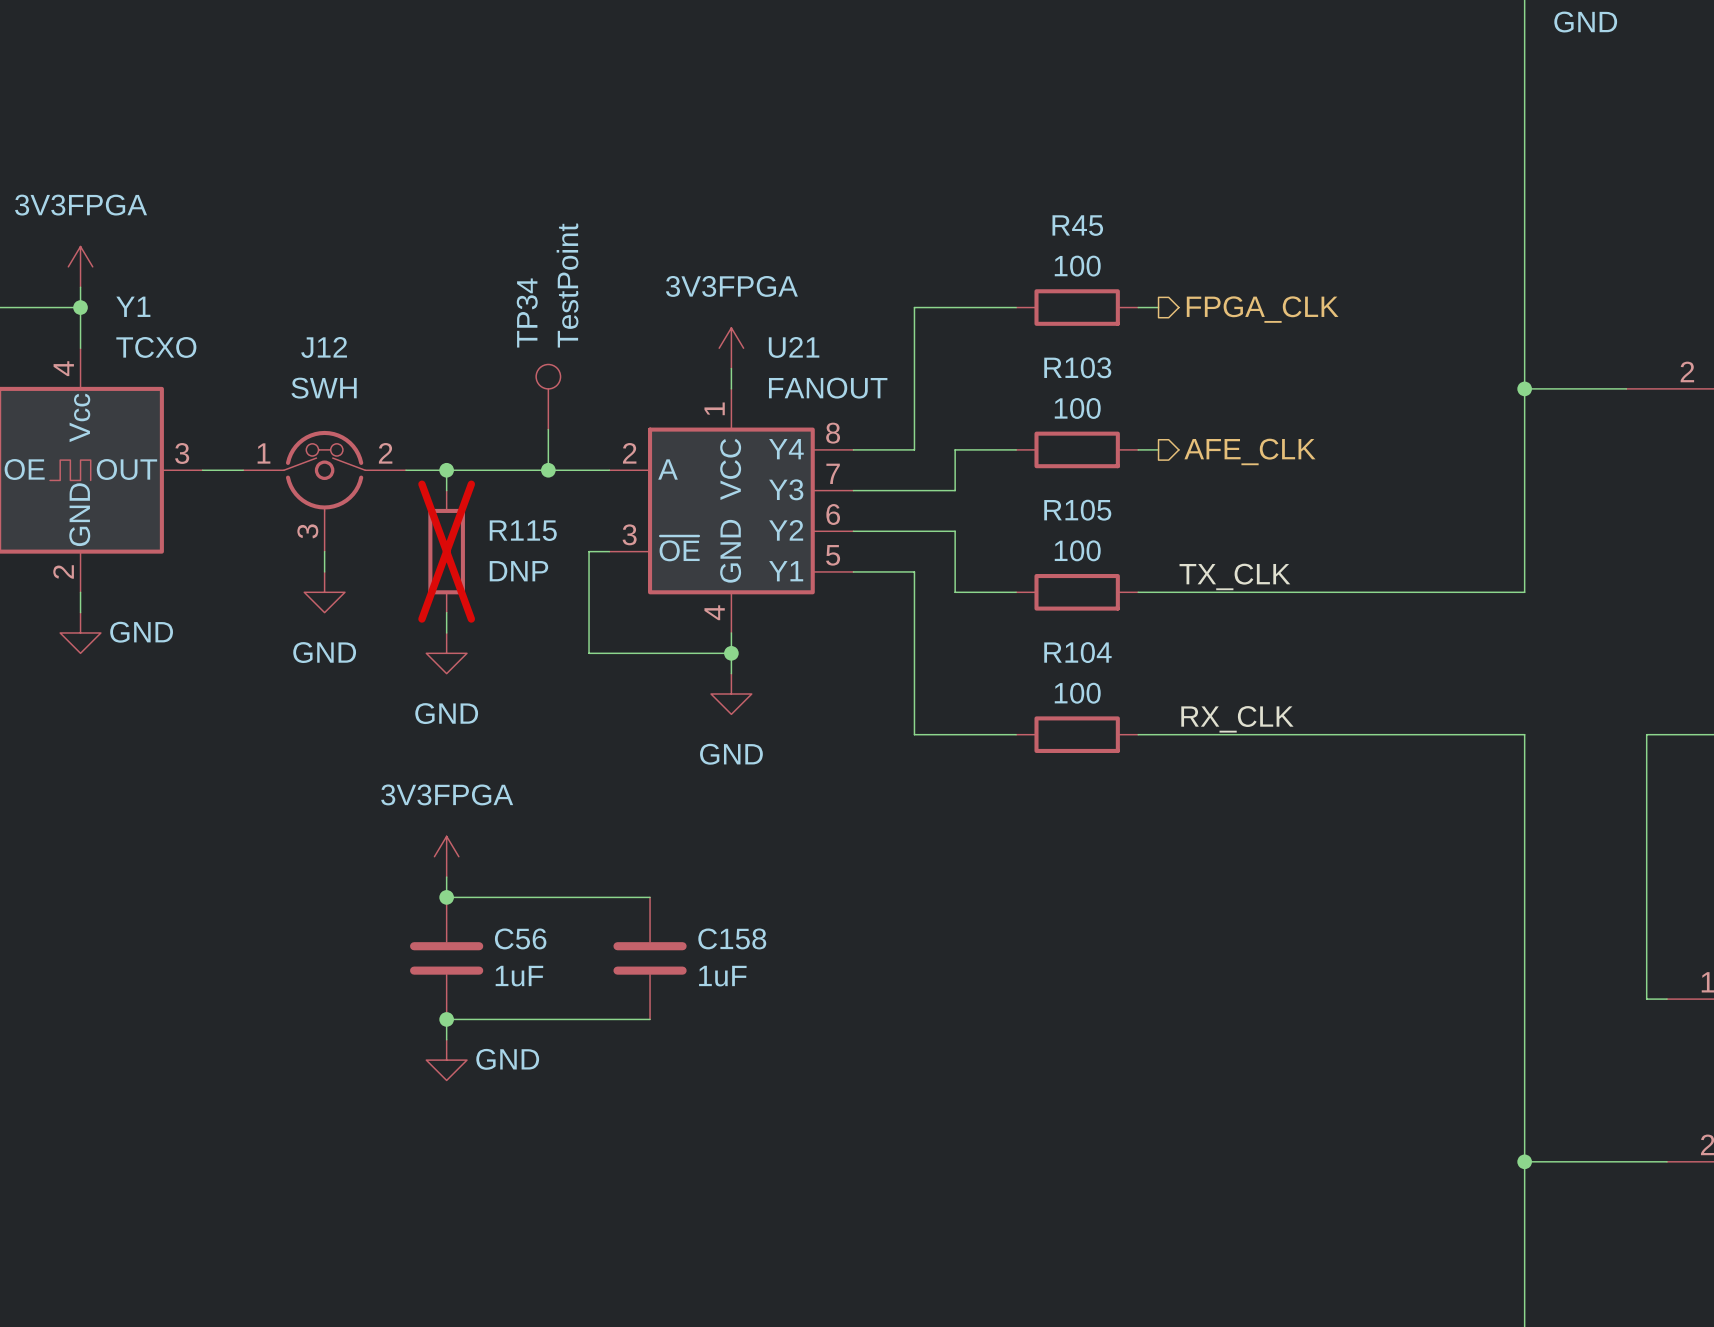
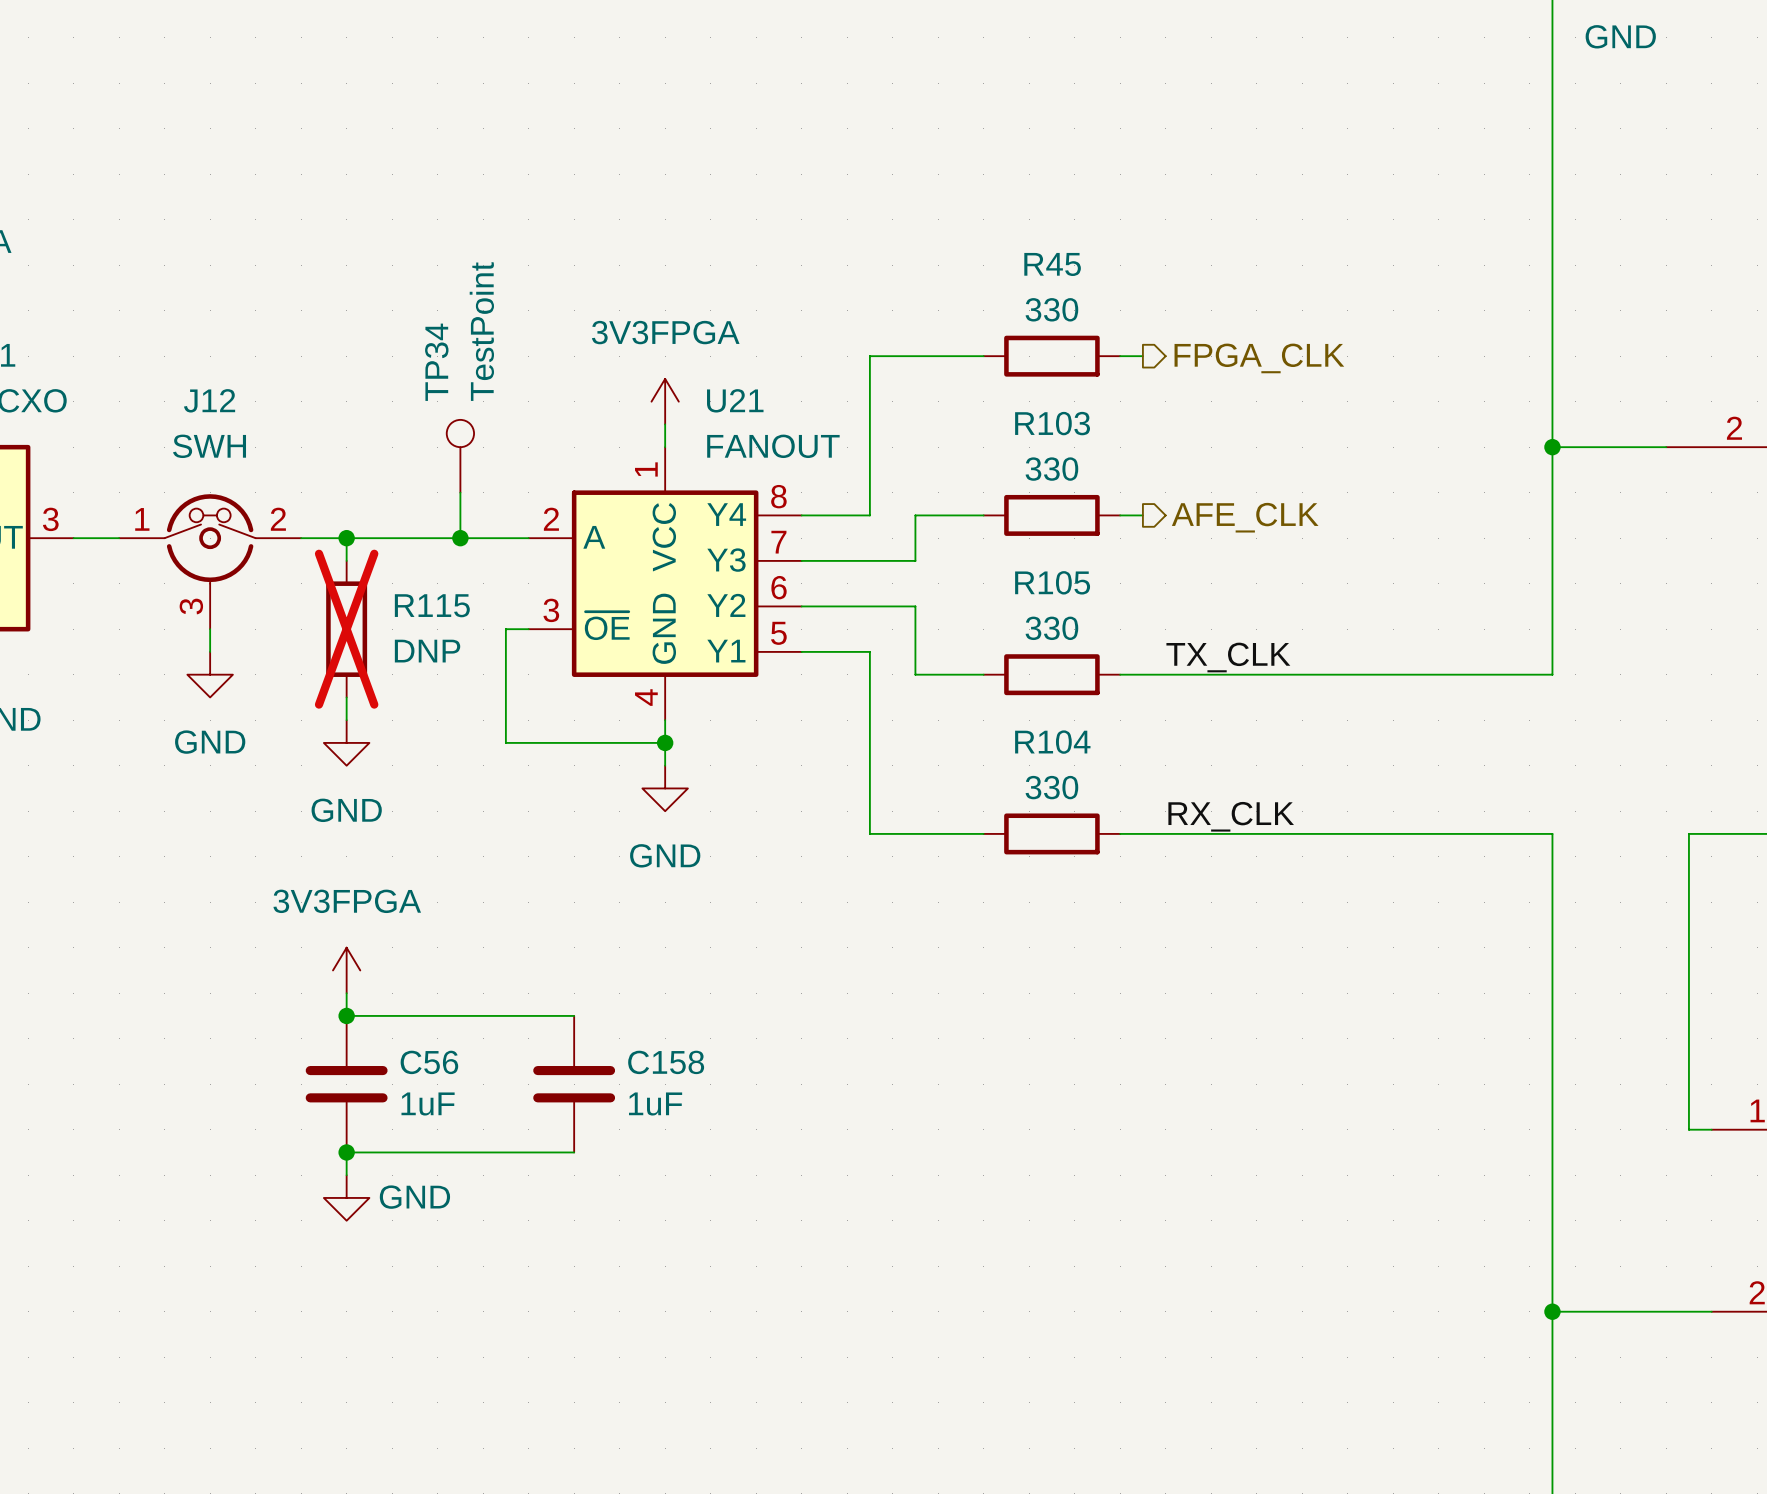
R45 value: 100 (1077, 266) -> 330 (1051, 309)
R103 value: 100 (1077, 408) -> 330 (1051, 469)
R105 value: 100 (1077, 550) -> 330 (1051, 628)
R104 value: 100 (1077, 693) -> 330 (1051, 787)

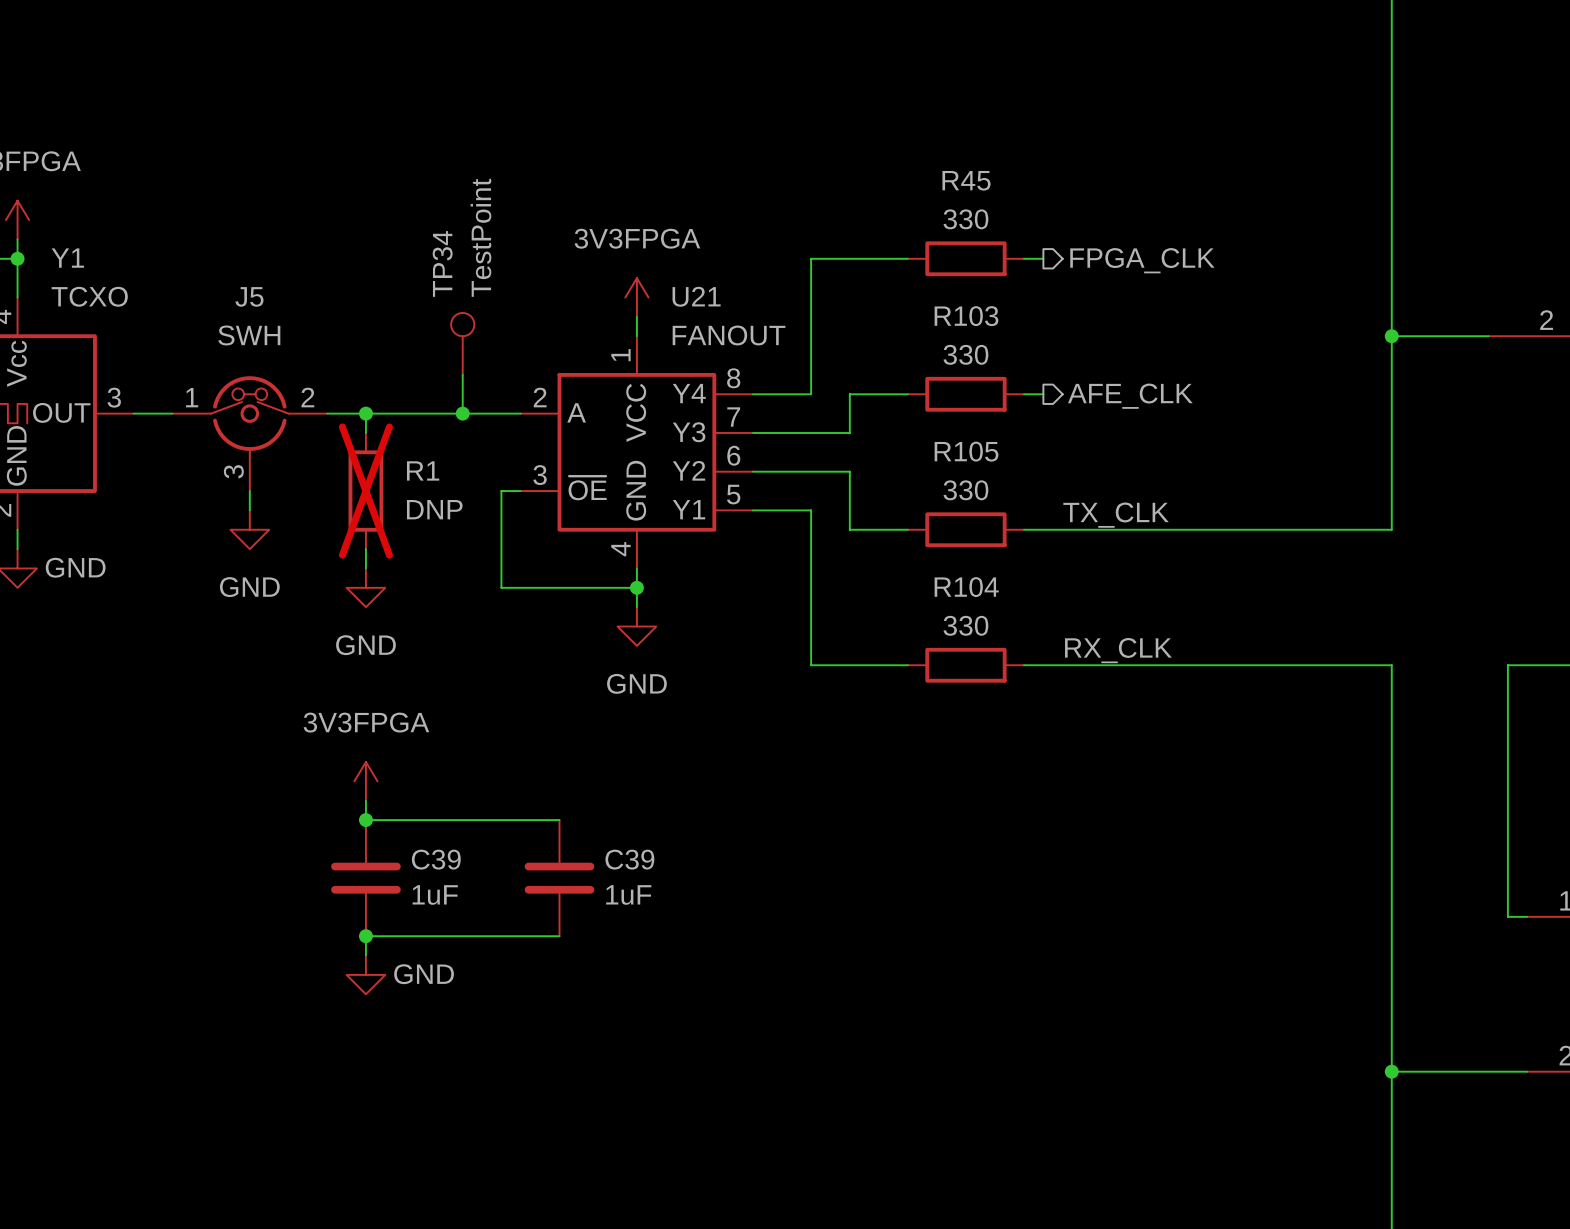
J12 name: J12 (209, 400) -> J5 (249, 296)
R115 name: R115 (432, 605) -> R1 (423, 470)
C56 name: C56 (429, 1062) -> C39 (436, 859)
C158 name: C158 (666, 1062) -> C39 (629, 859)

